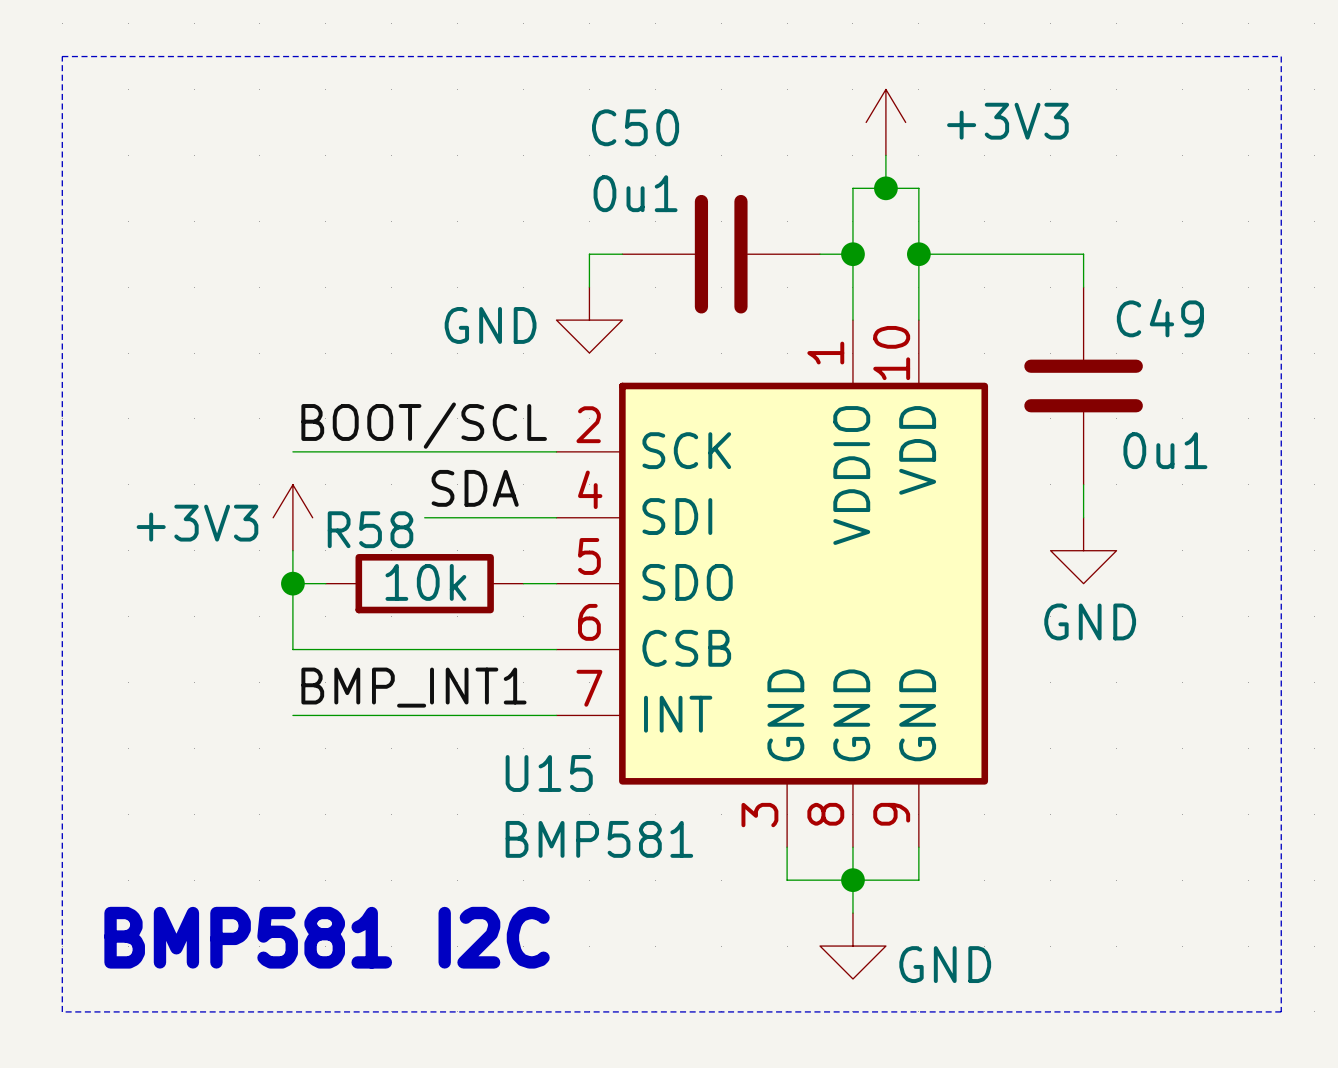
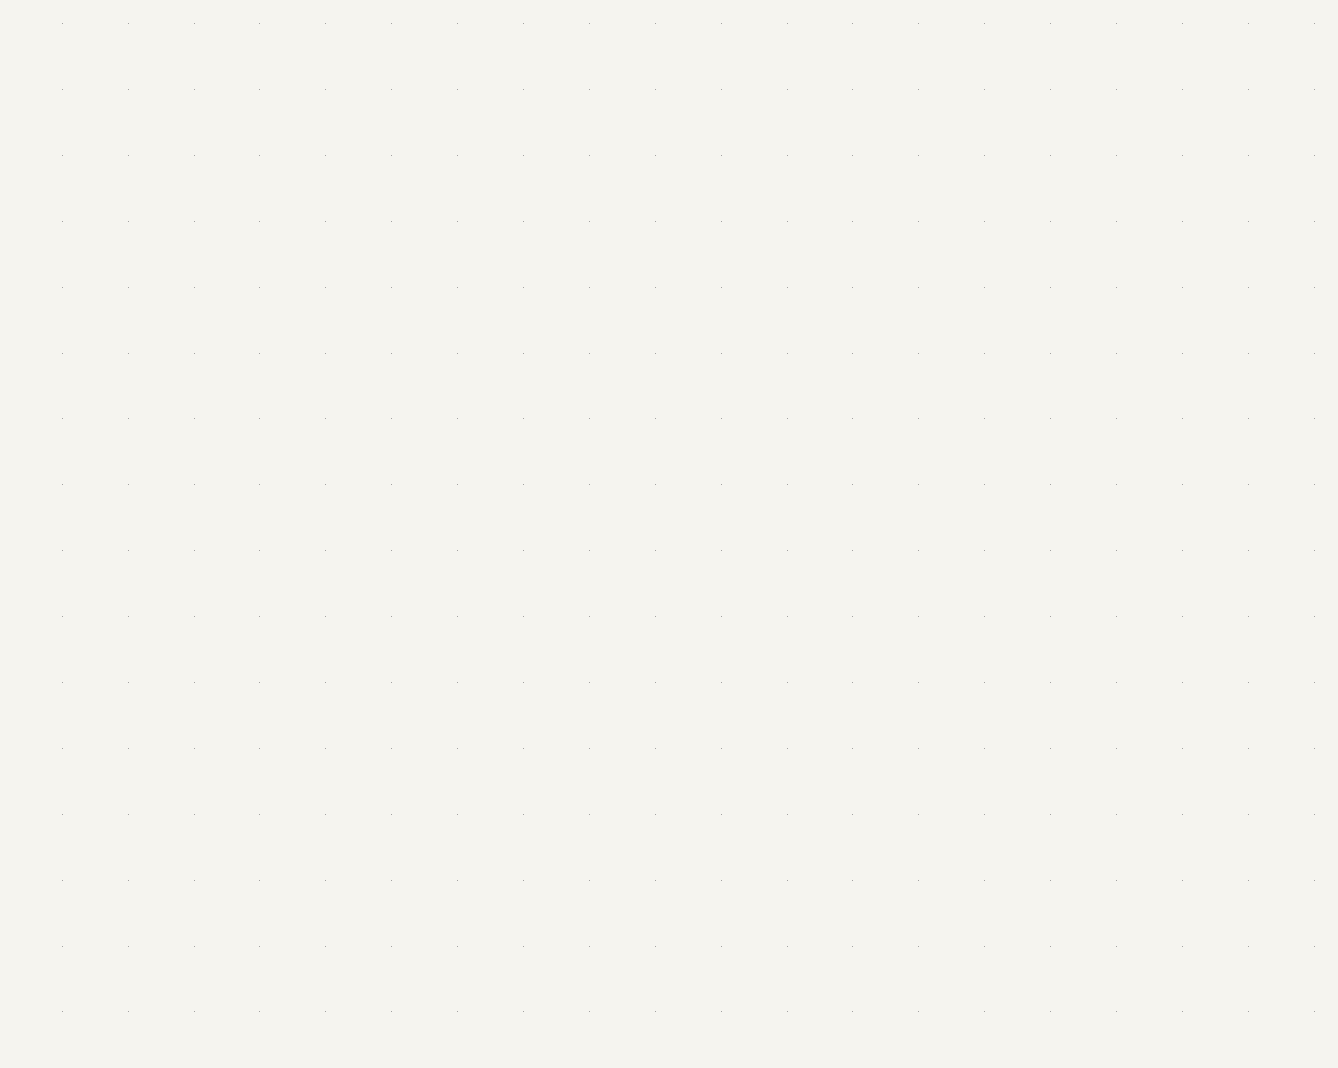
line: (62, 56) (1281, 56) (1281, 1011) (62, 1011) (62, 56) -> none
power symbol: +3V3 (885, 122) -> none
wire: (885, 155) (885, 188) -> none
junction: (885, 188) -> none
wire: (622, 254) (589, 254) (589, 287) -> none
C50: 0u1 (721, 254) -> none
wire: (820, 254) (852, 254) -> none
junction: (852, 254) -> none
wire: (918, 254) (1083, 254) (1083, 287) -> none
junction: (918, 254) -> none
power symbol: GND (589, 320) -> none
wire: (852, 320) (852, 188) (918, 188) (918, 320) -> none
C49: 0u1 (1083, 385) -> none
label: BOOT/SCL (424, 425) -> none
wire: (292, 451) (556, 451) -> none
wire: (1083, 484) (1083, 517) -> none
label: SDA (475, 488) -> none
power symbol: +3V3 (292, 517) -> none
wire: (424, 517) (556, 517) -> none
wire: (292, 550) (292, 649) (556, 649) -> none
power symbol: GND (1083, 550) -> none
wire: (292, 583) (325, 583) -> none
junction: (292, 583) -> none
R58: 10k (424, 583) -> none
wire: (523, 583) (556, 583) -> none
U15: BMP581 (772, 583) -> none
label: BMP_INT1 (413, 687) -> none
wire: (292, 715) (556, 715) -> none
wire: (787, 847) (787, 880) (918, 880) (918, 847) -> none
wire: (852, 847) (852, 913) -> none
junction: (852, 880) -> none
text: BMP581 I2C (327, 937) -> none
power symbol: GND (852, 946) -> none

